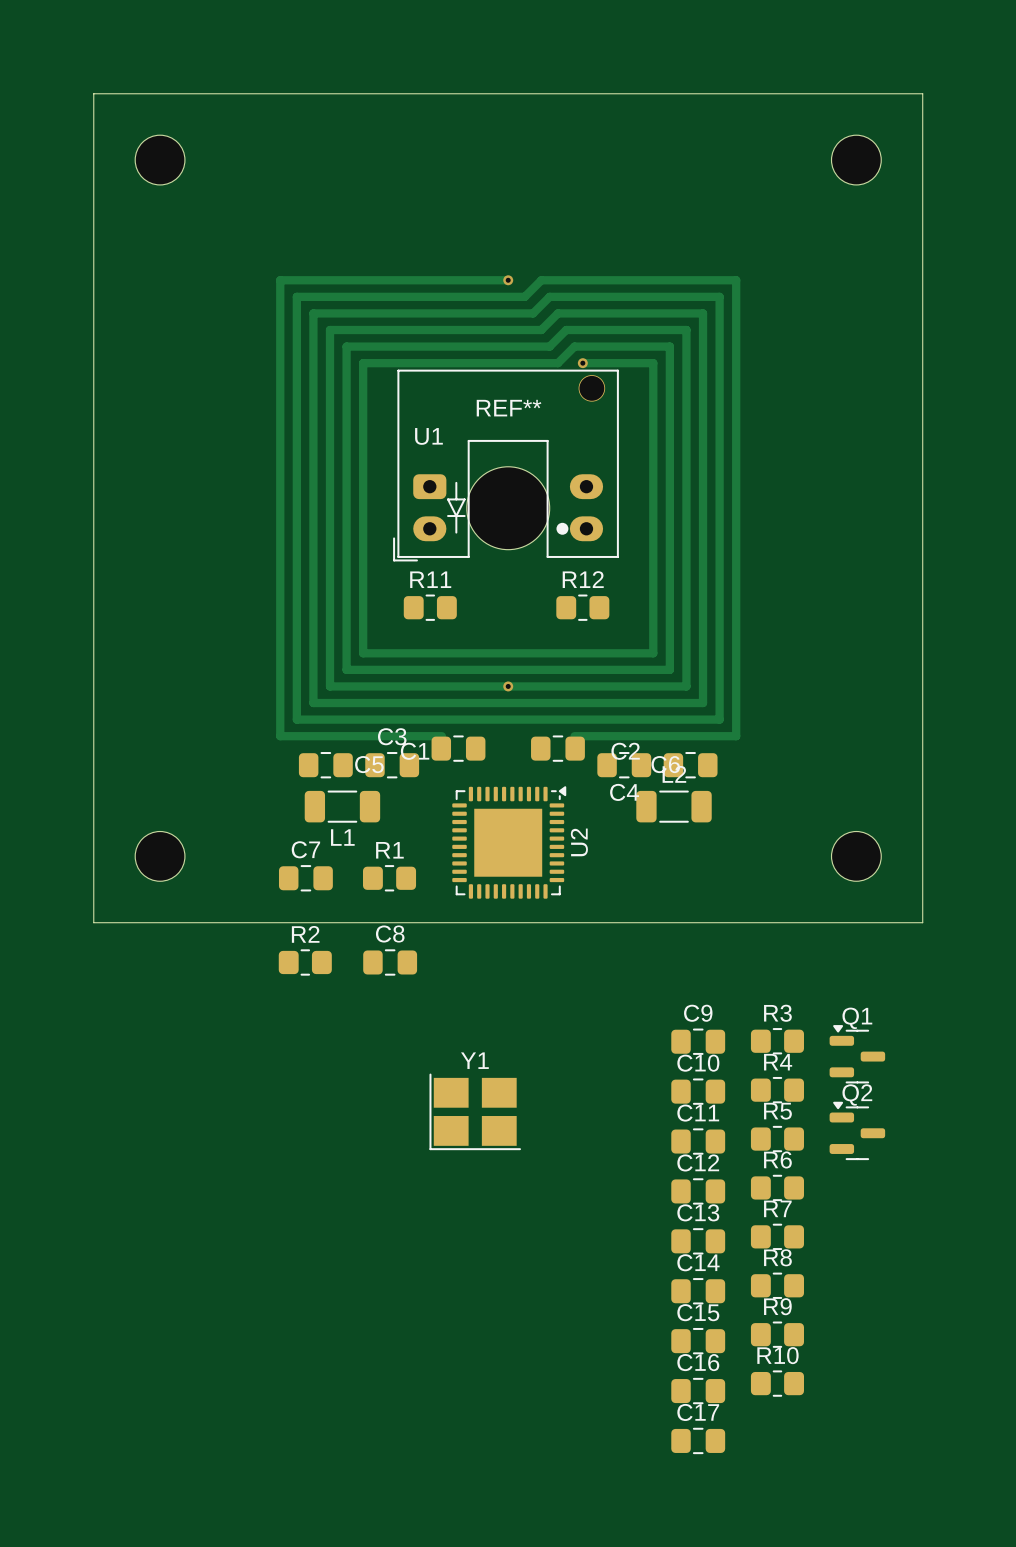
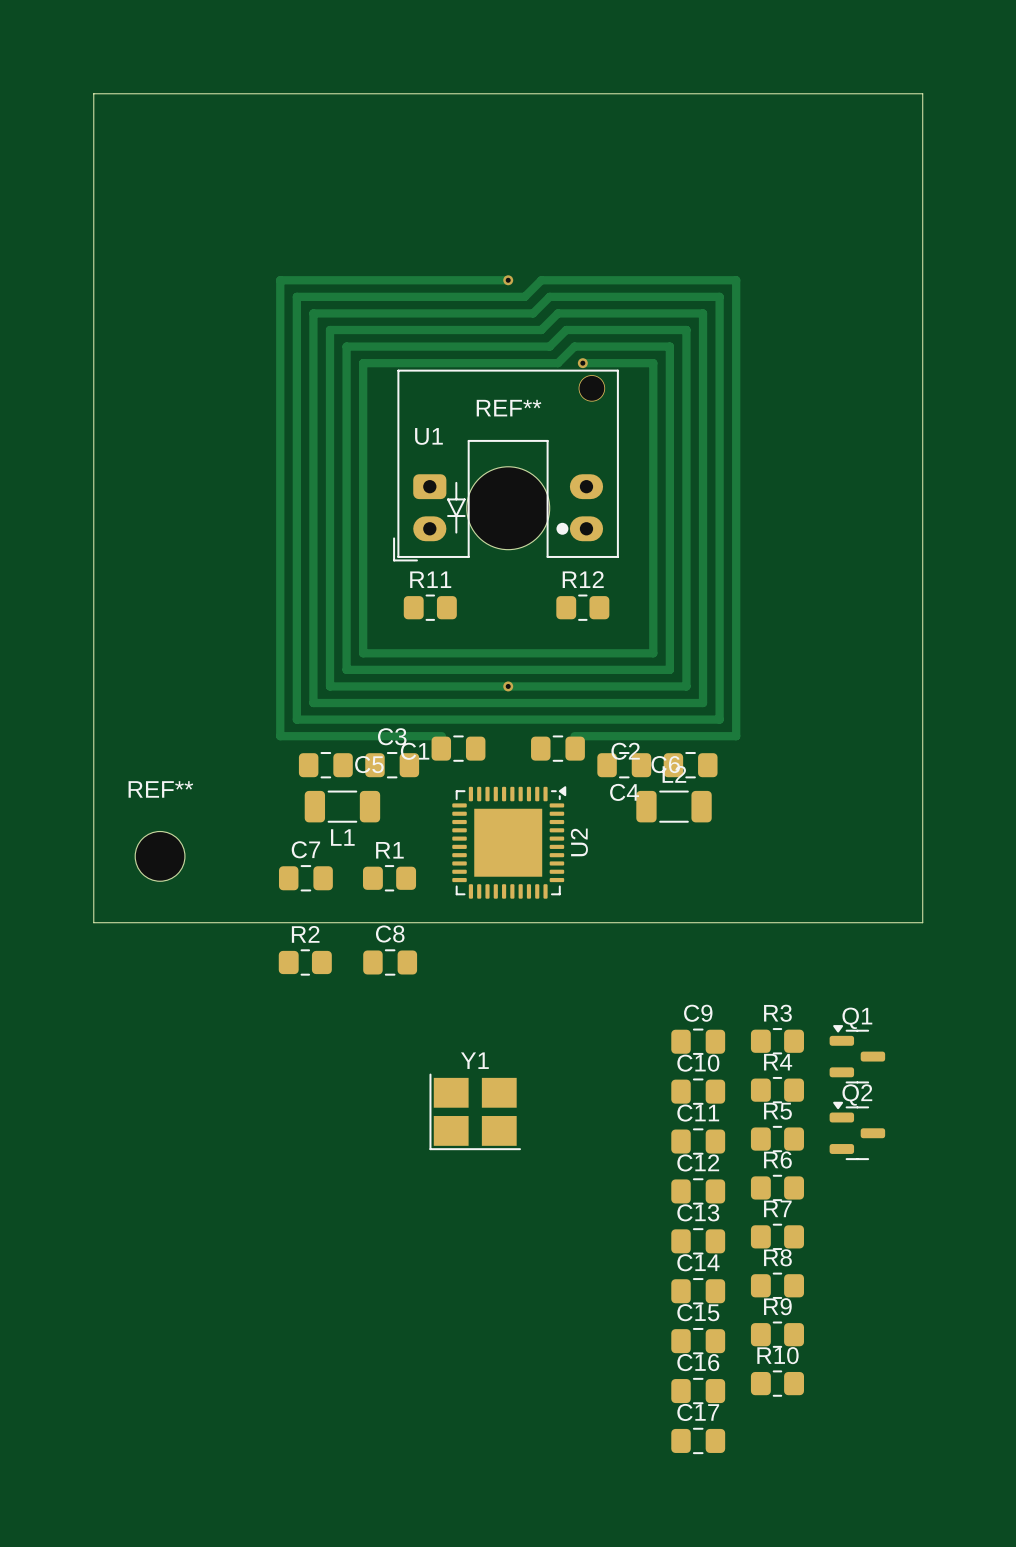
part: (160, 160) -> none
part: (856, 160) -> none
REF** name: none -> REF** (160, 789)
part: (856, 856) -> none

